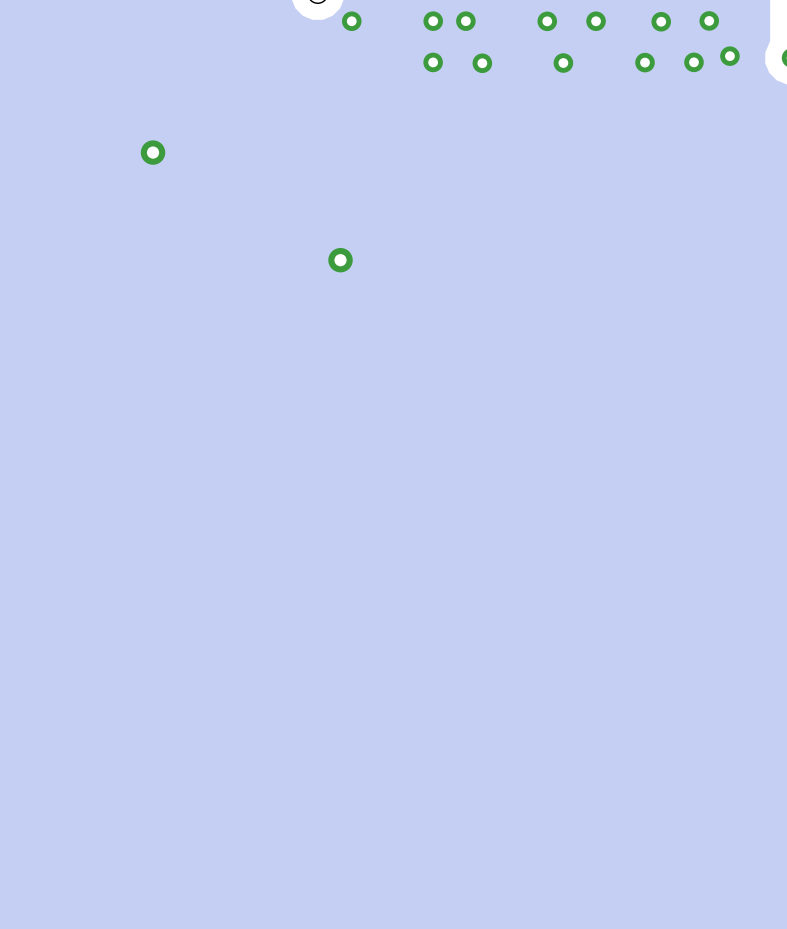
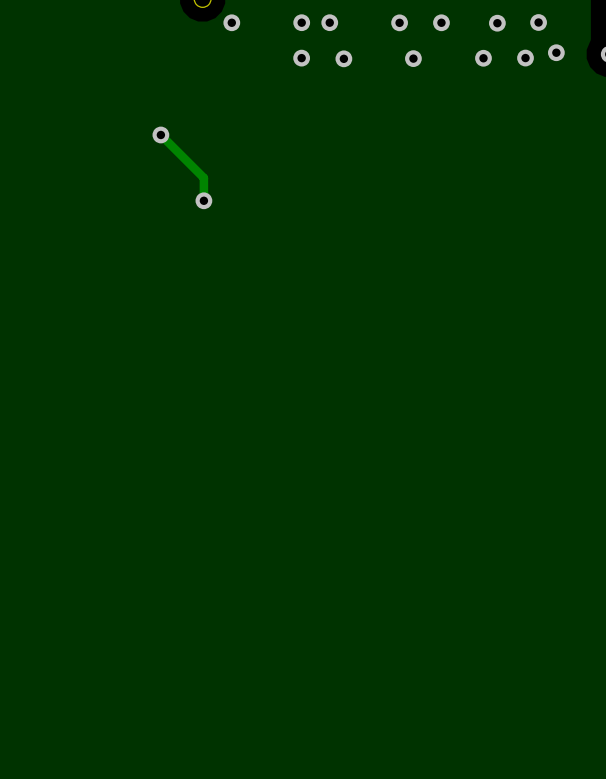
track: none -> (160, 134) (203, 178) (203, 200)
via: none -> (160, 134)
via: (153, 152) -> none
via: none -> (203, 200)
via: (340, 260) -> none

